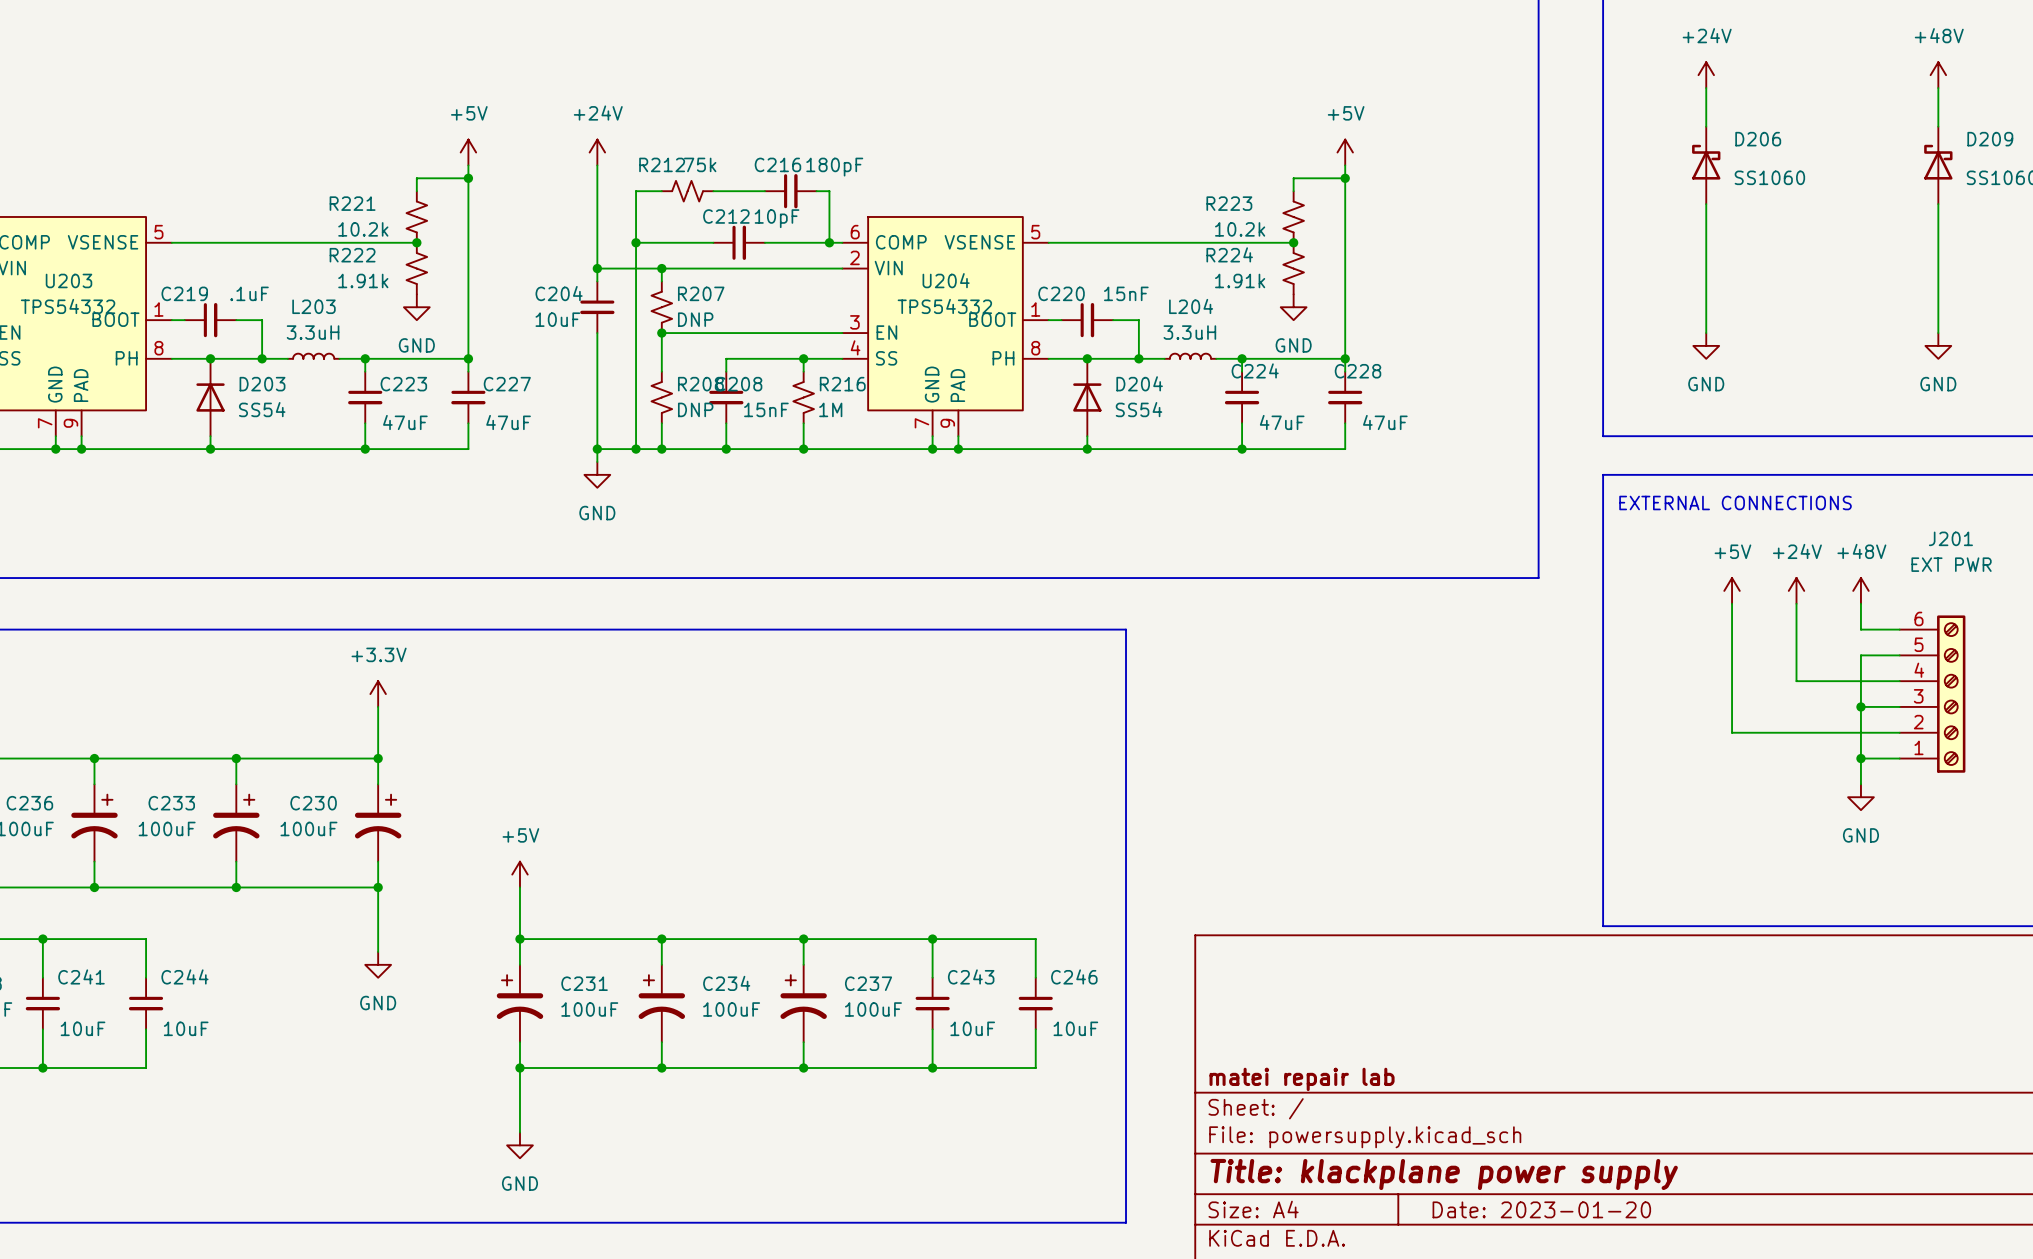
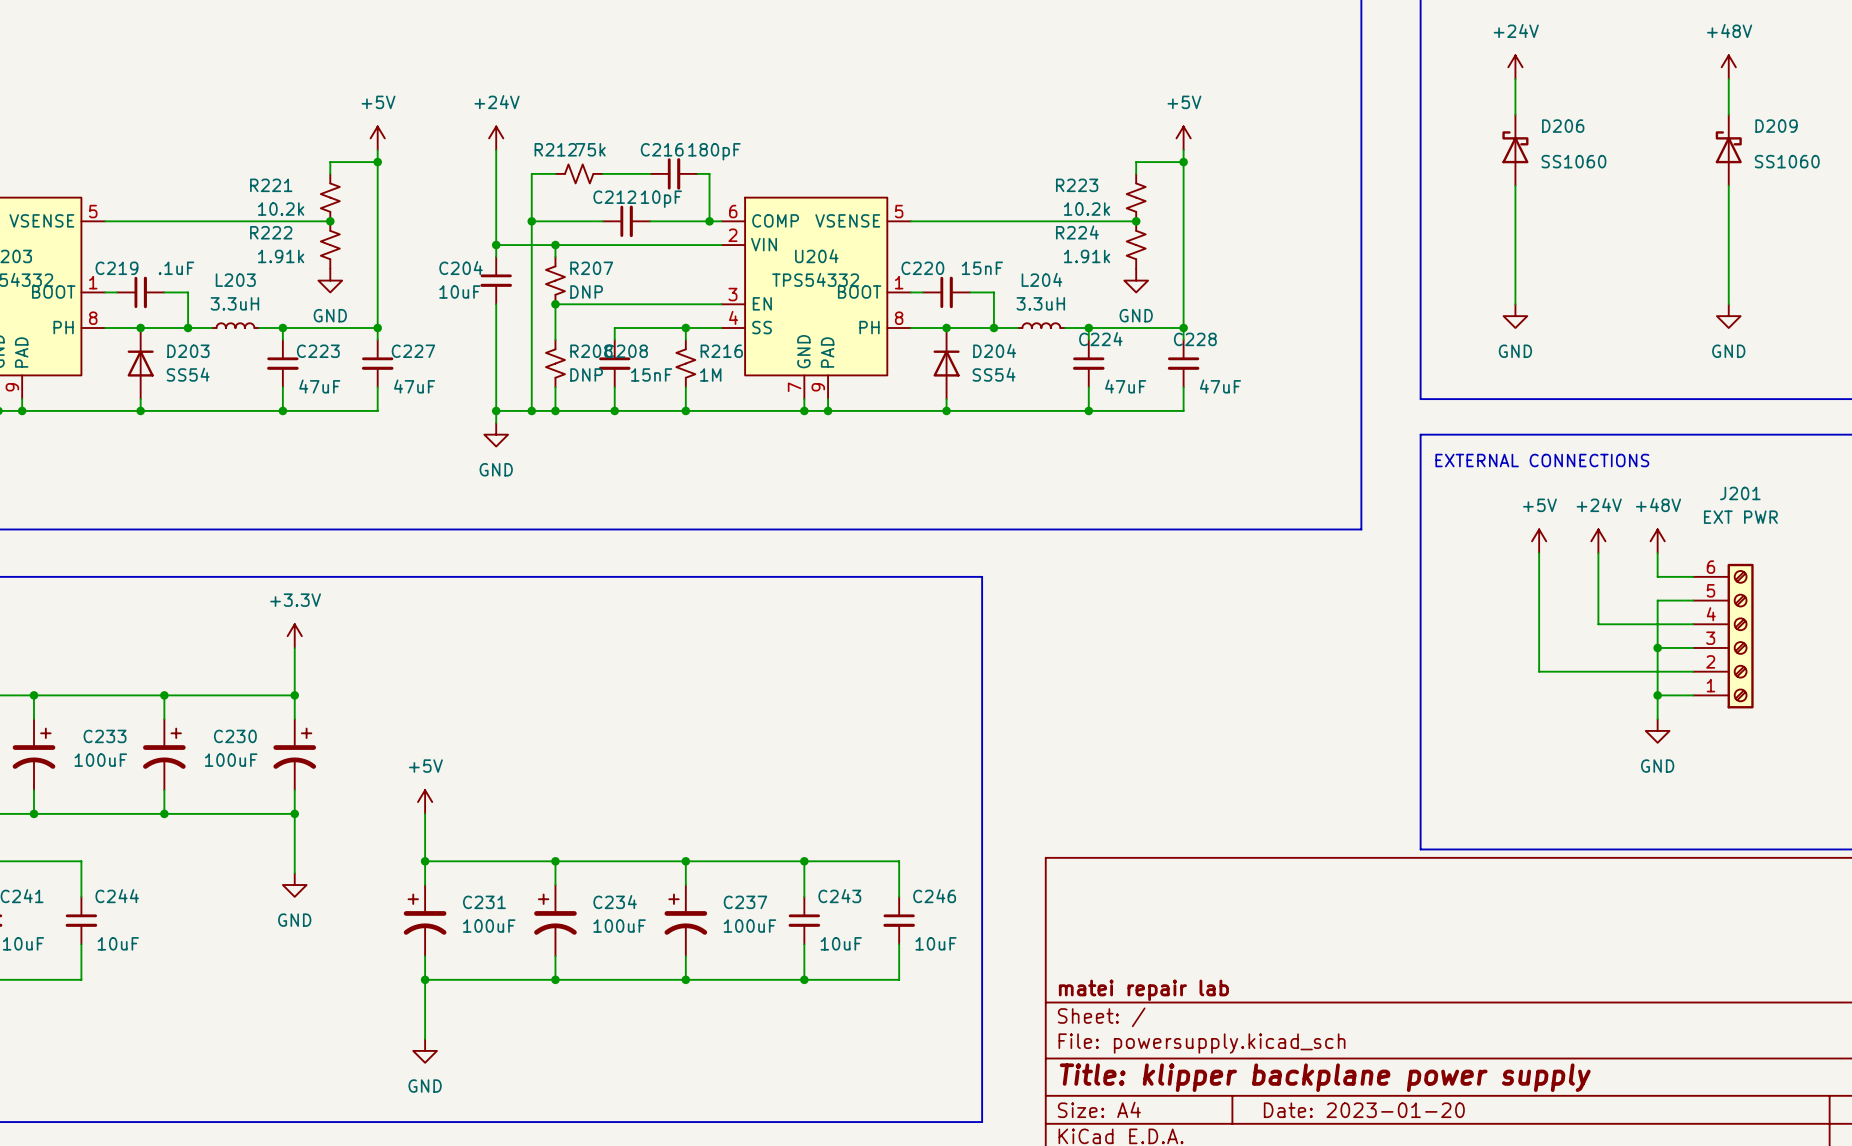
title block: Title: klackplane power supply (1444, 1174) -> Title: klipper backplane power supply (1325, 1077)

